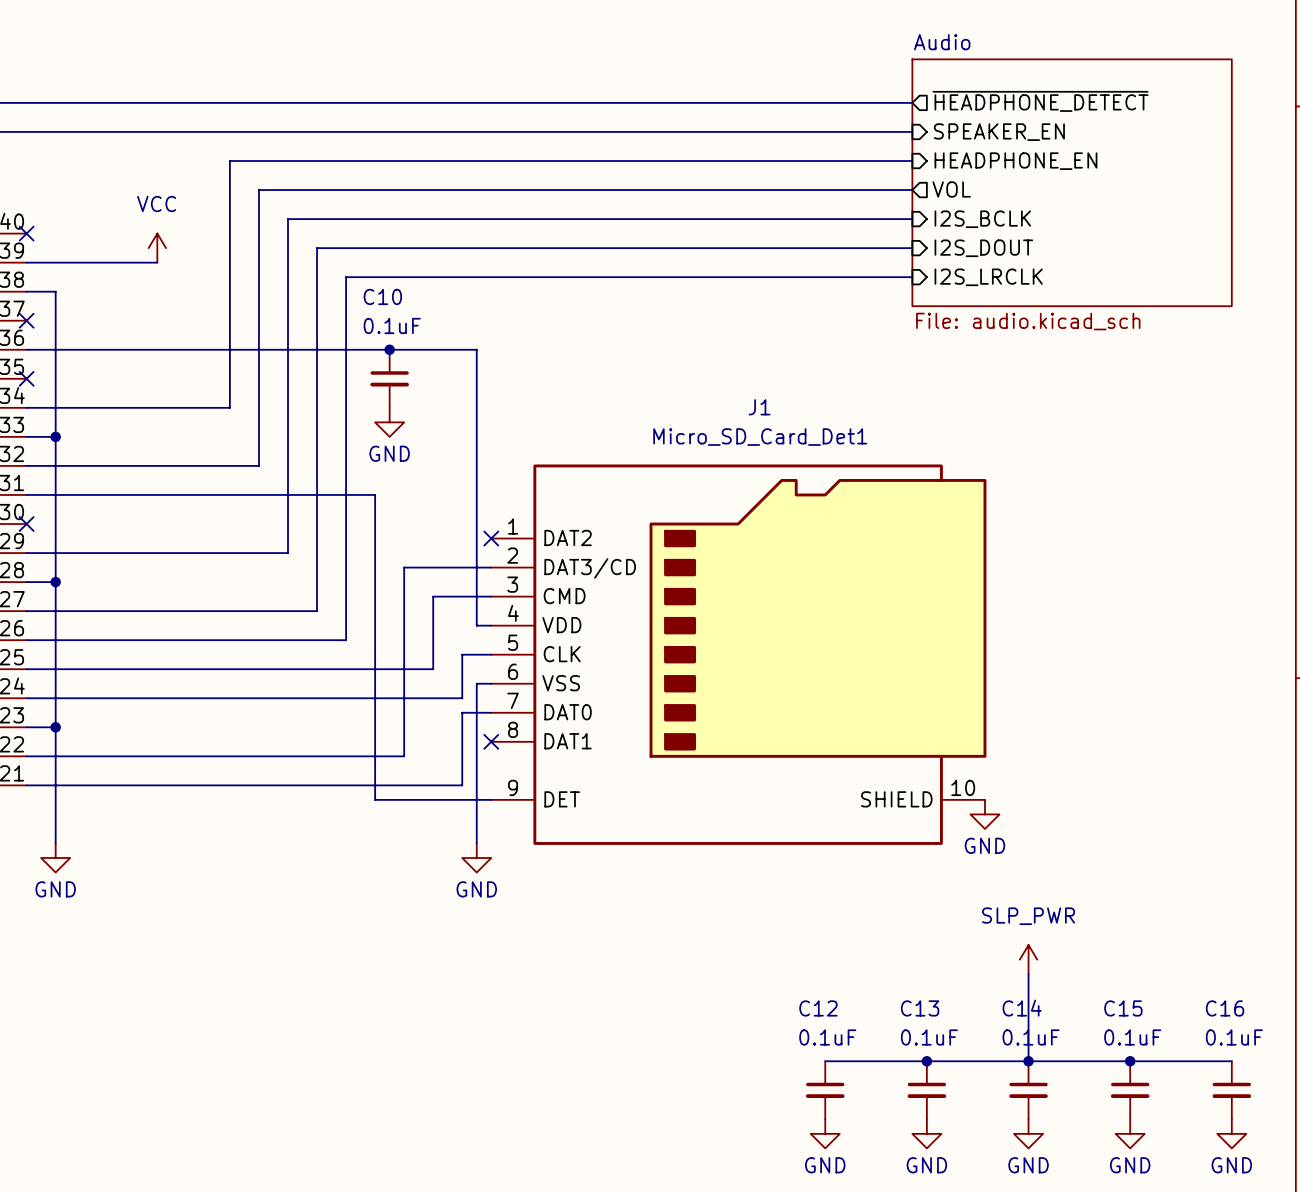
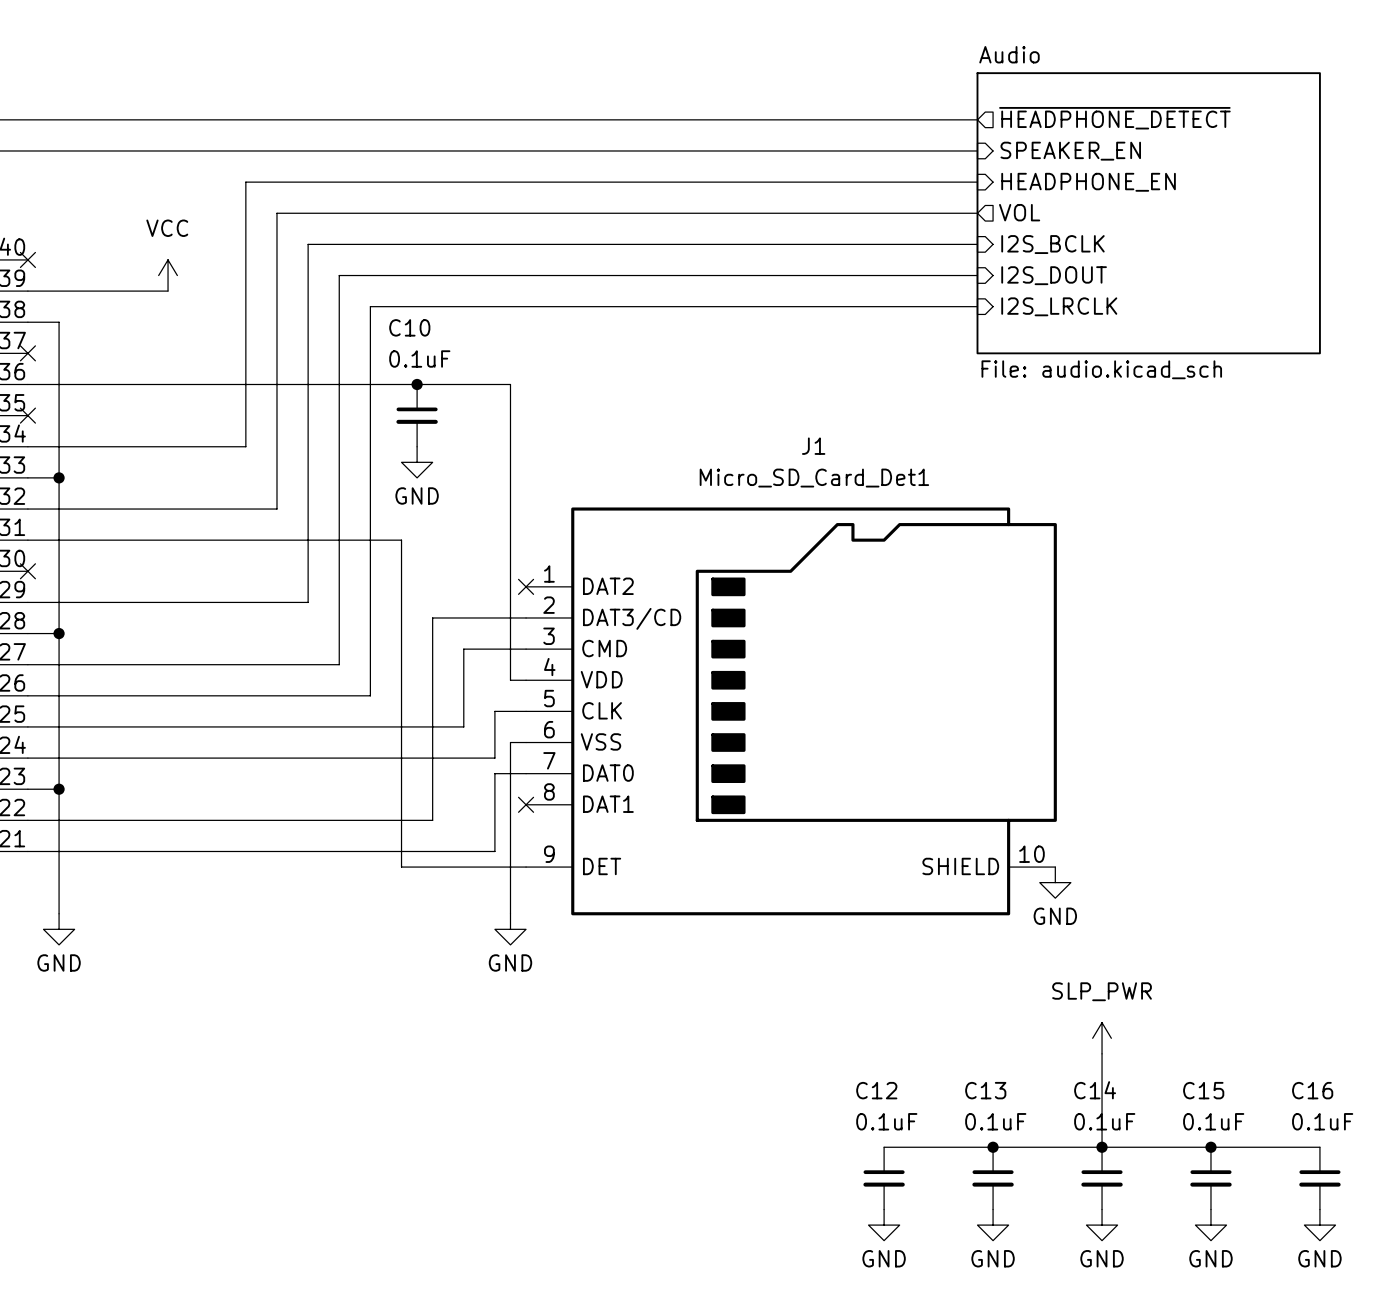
sheet Audio shape: [911, 58, 1233, 308] -> [976, 72, 1321, 355]

